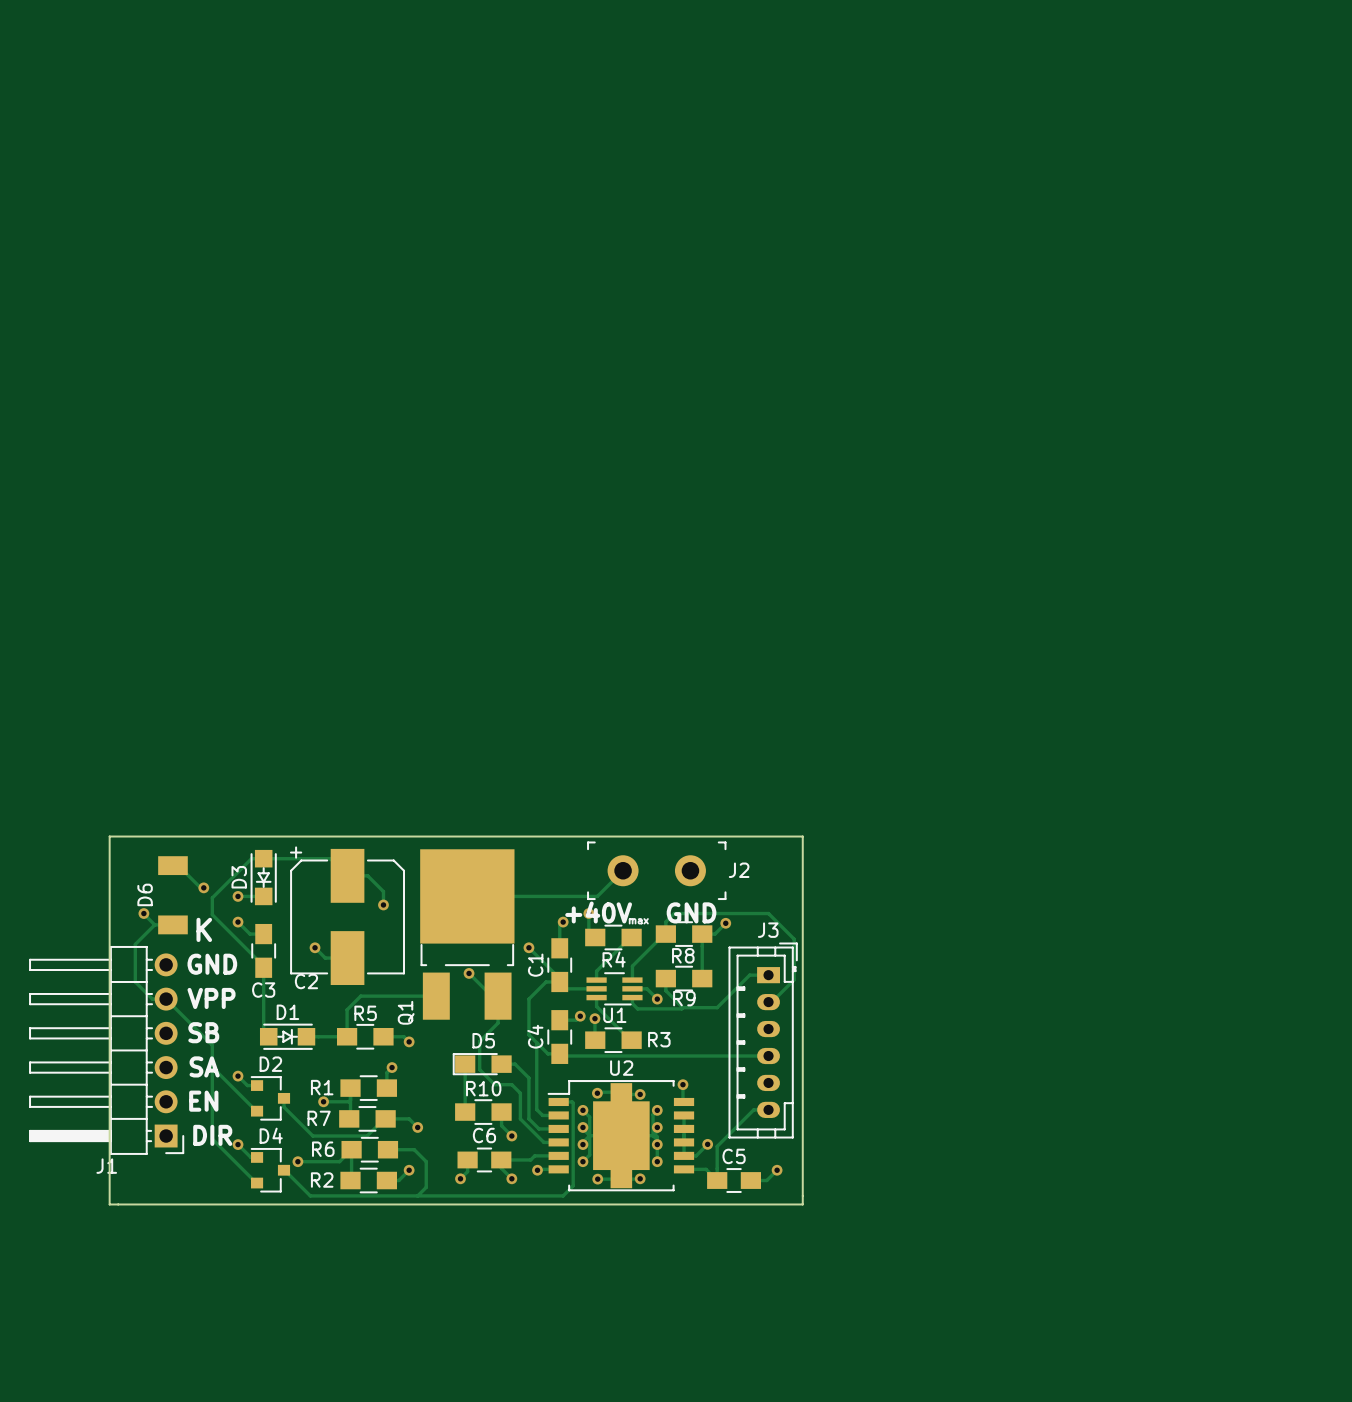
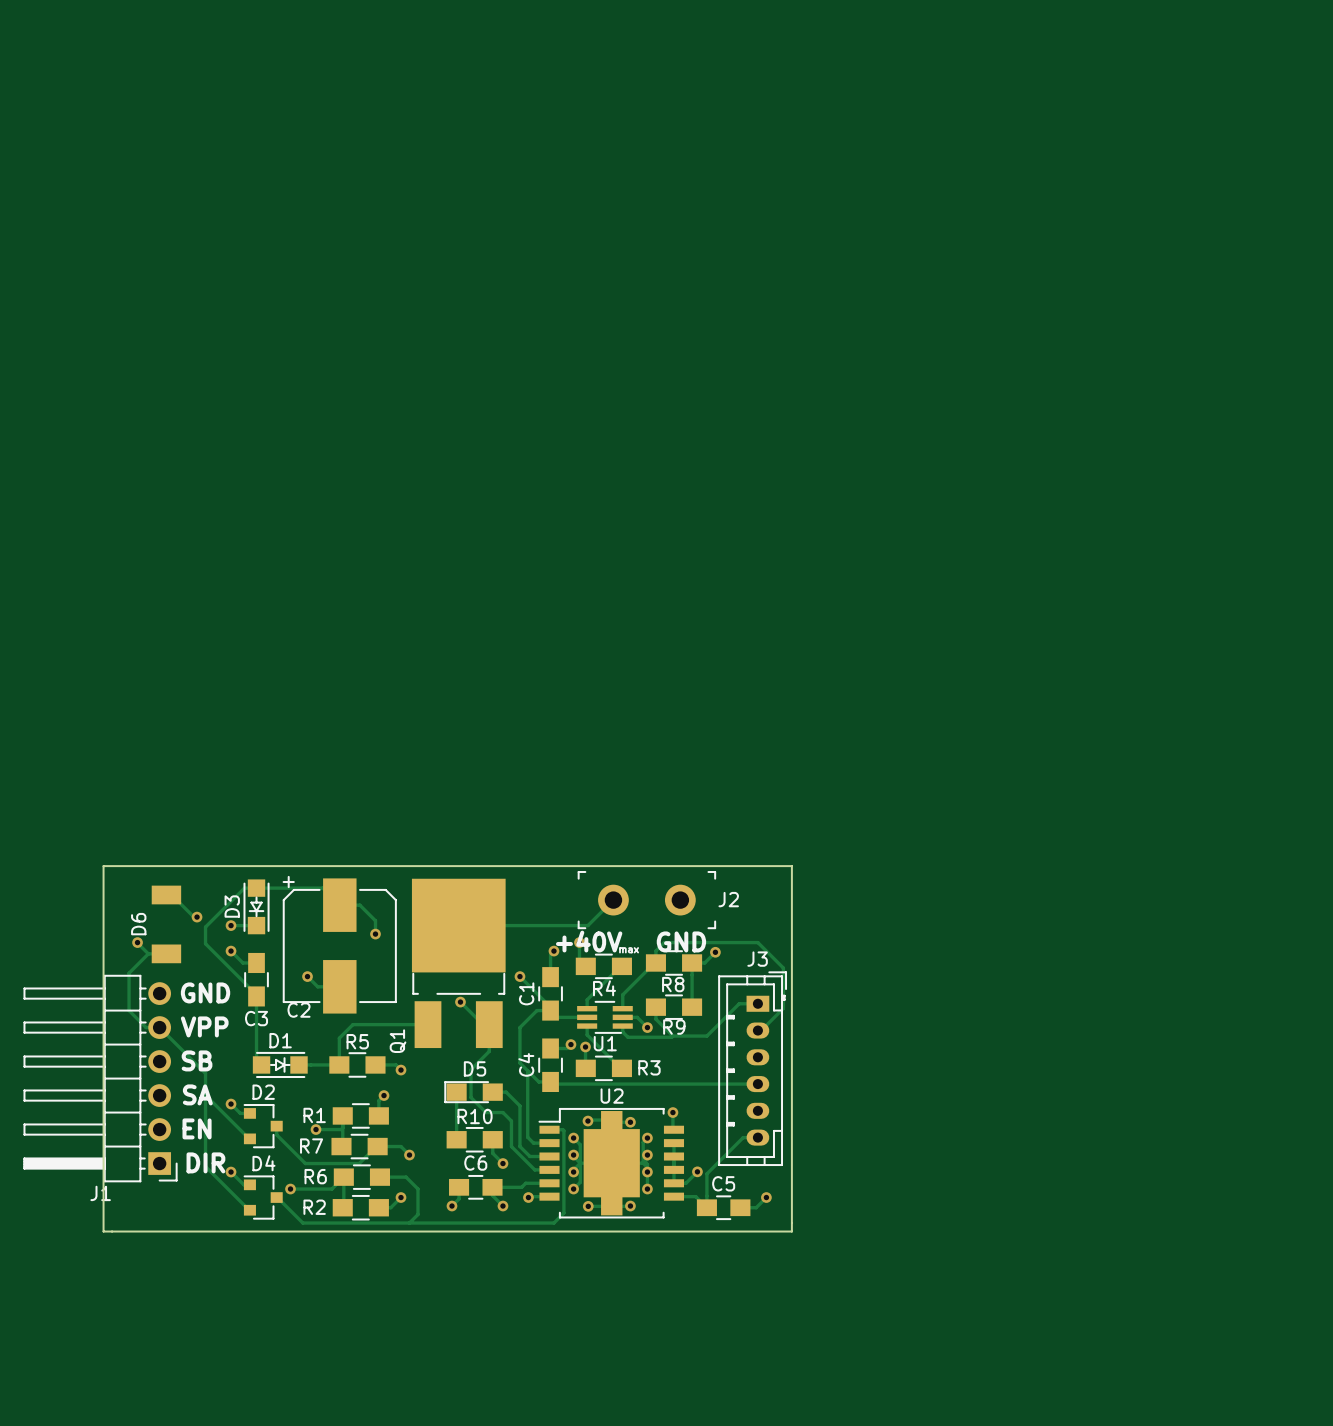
text: K (204, 929) -> none

